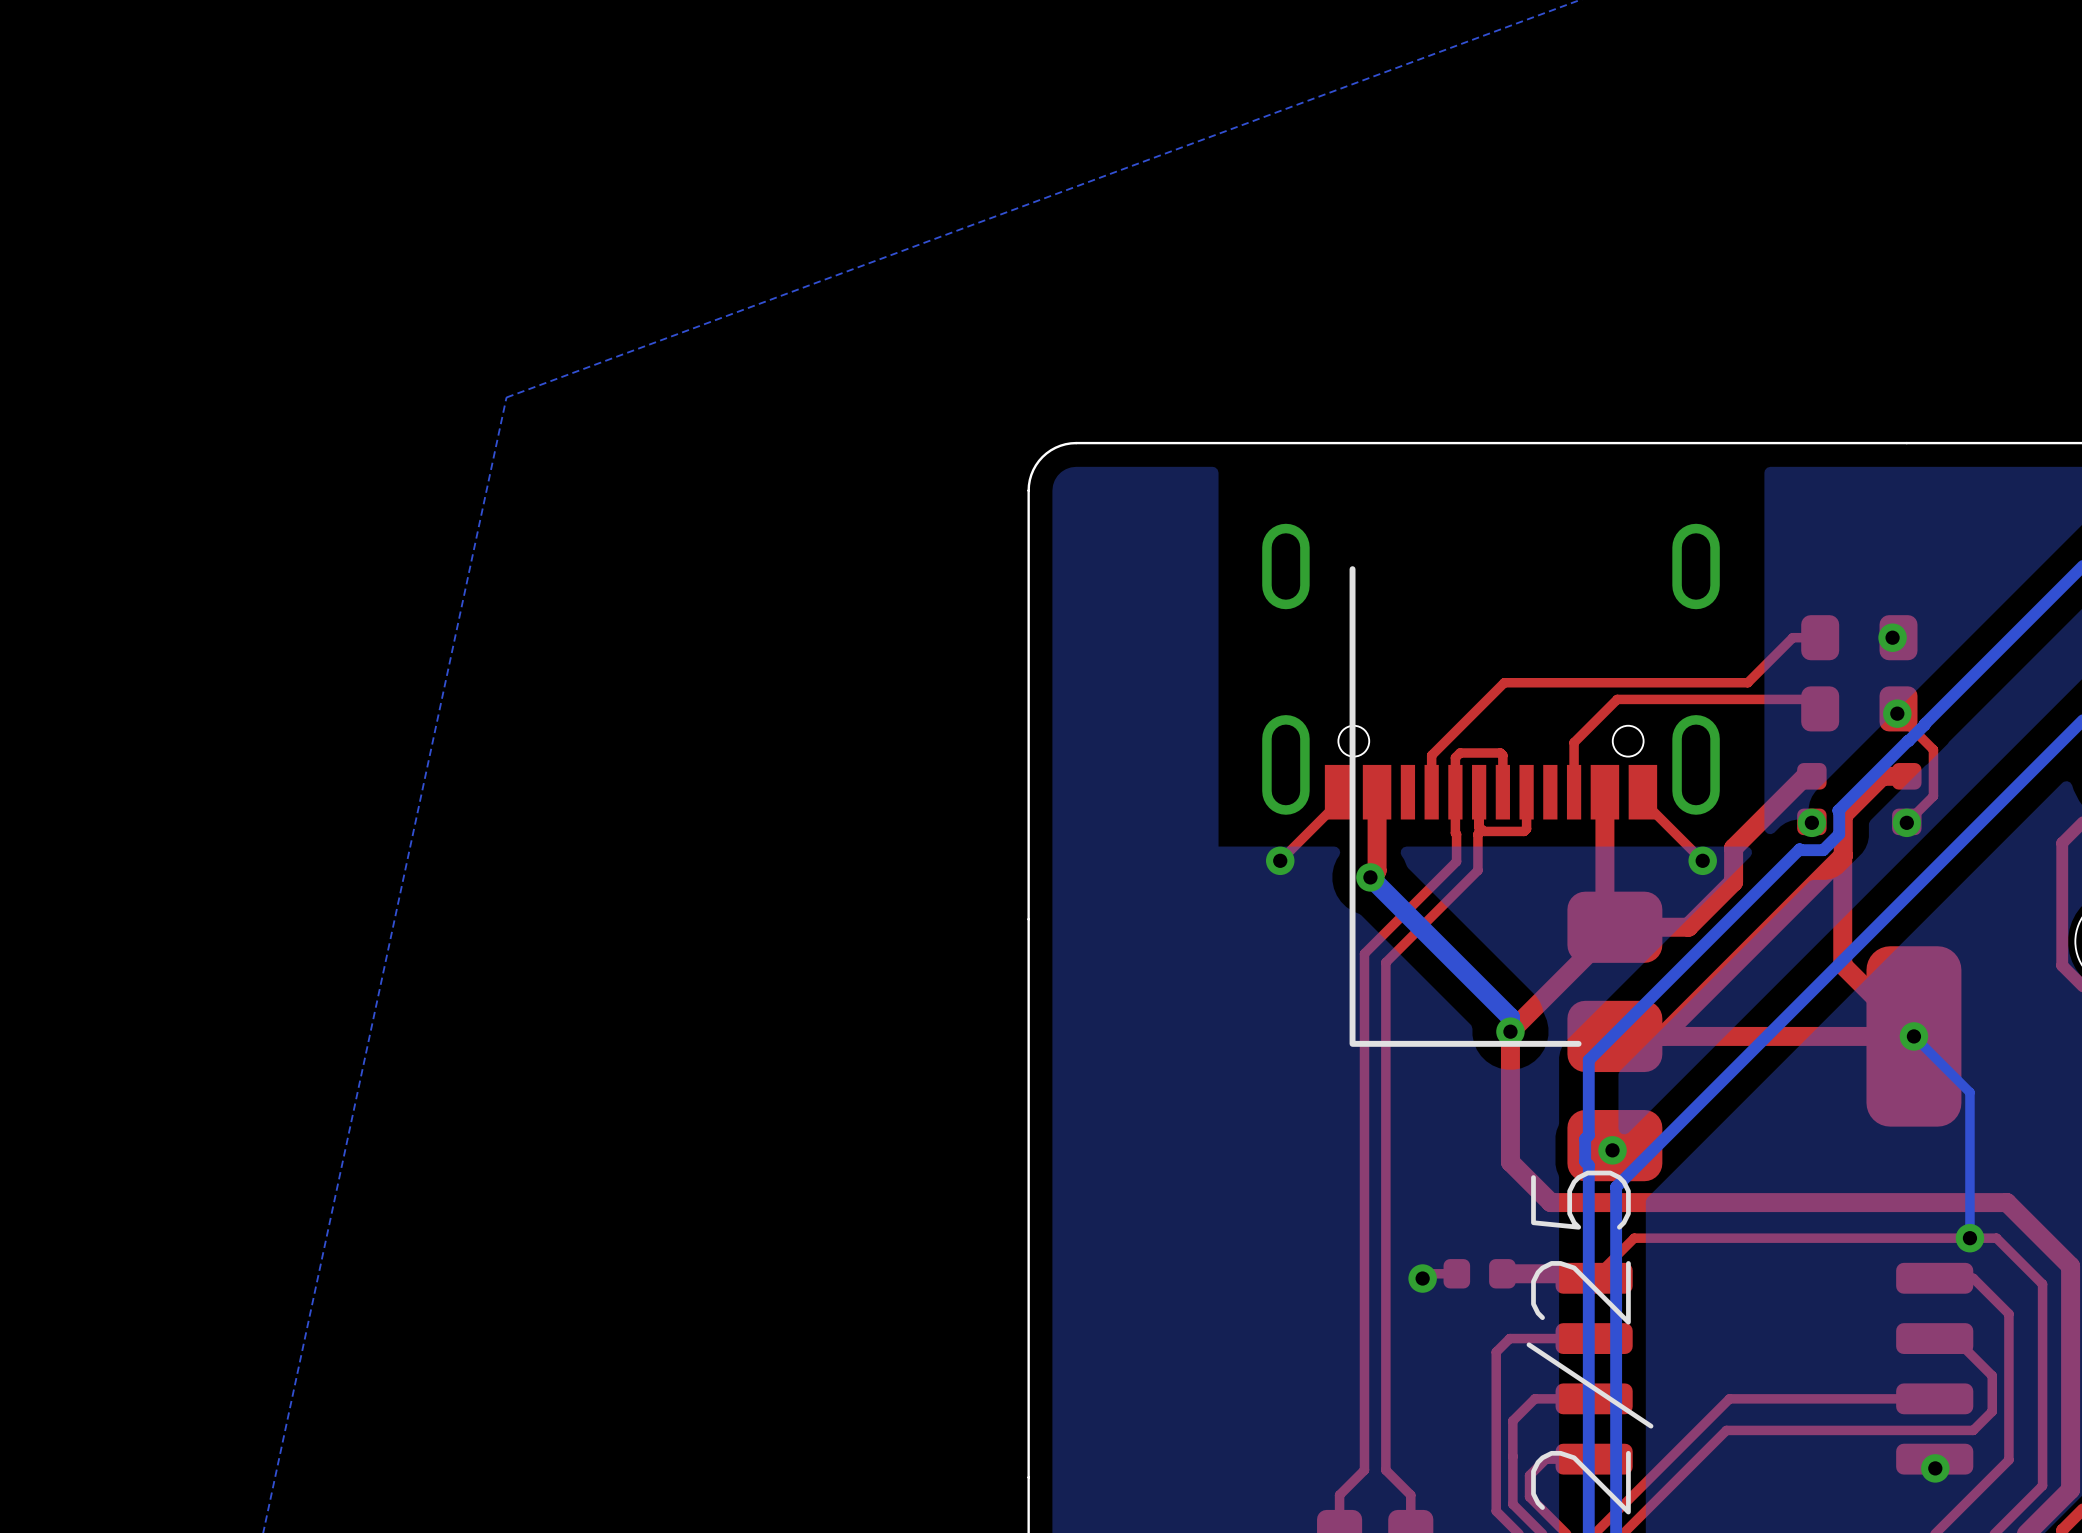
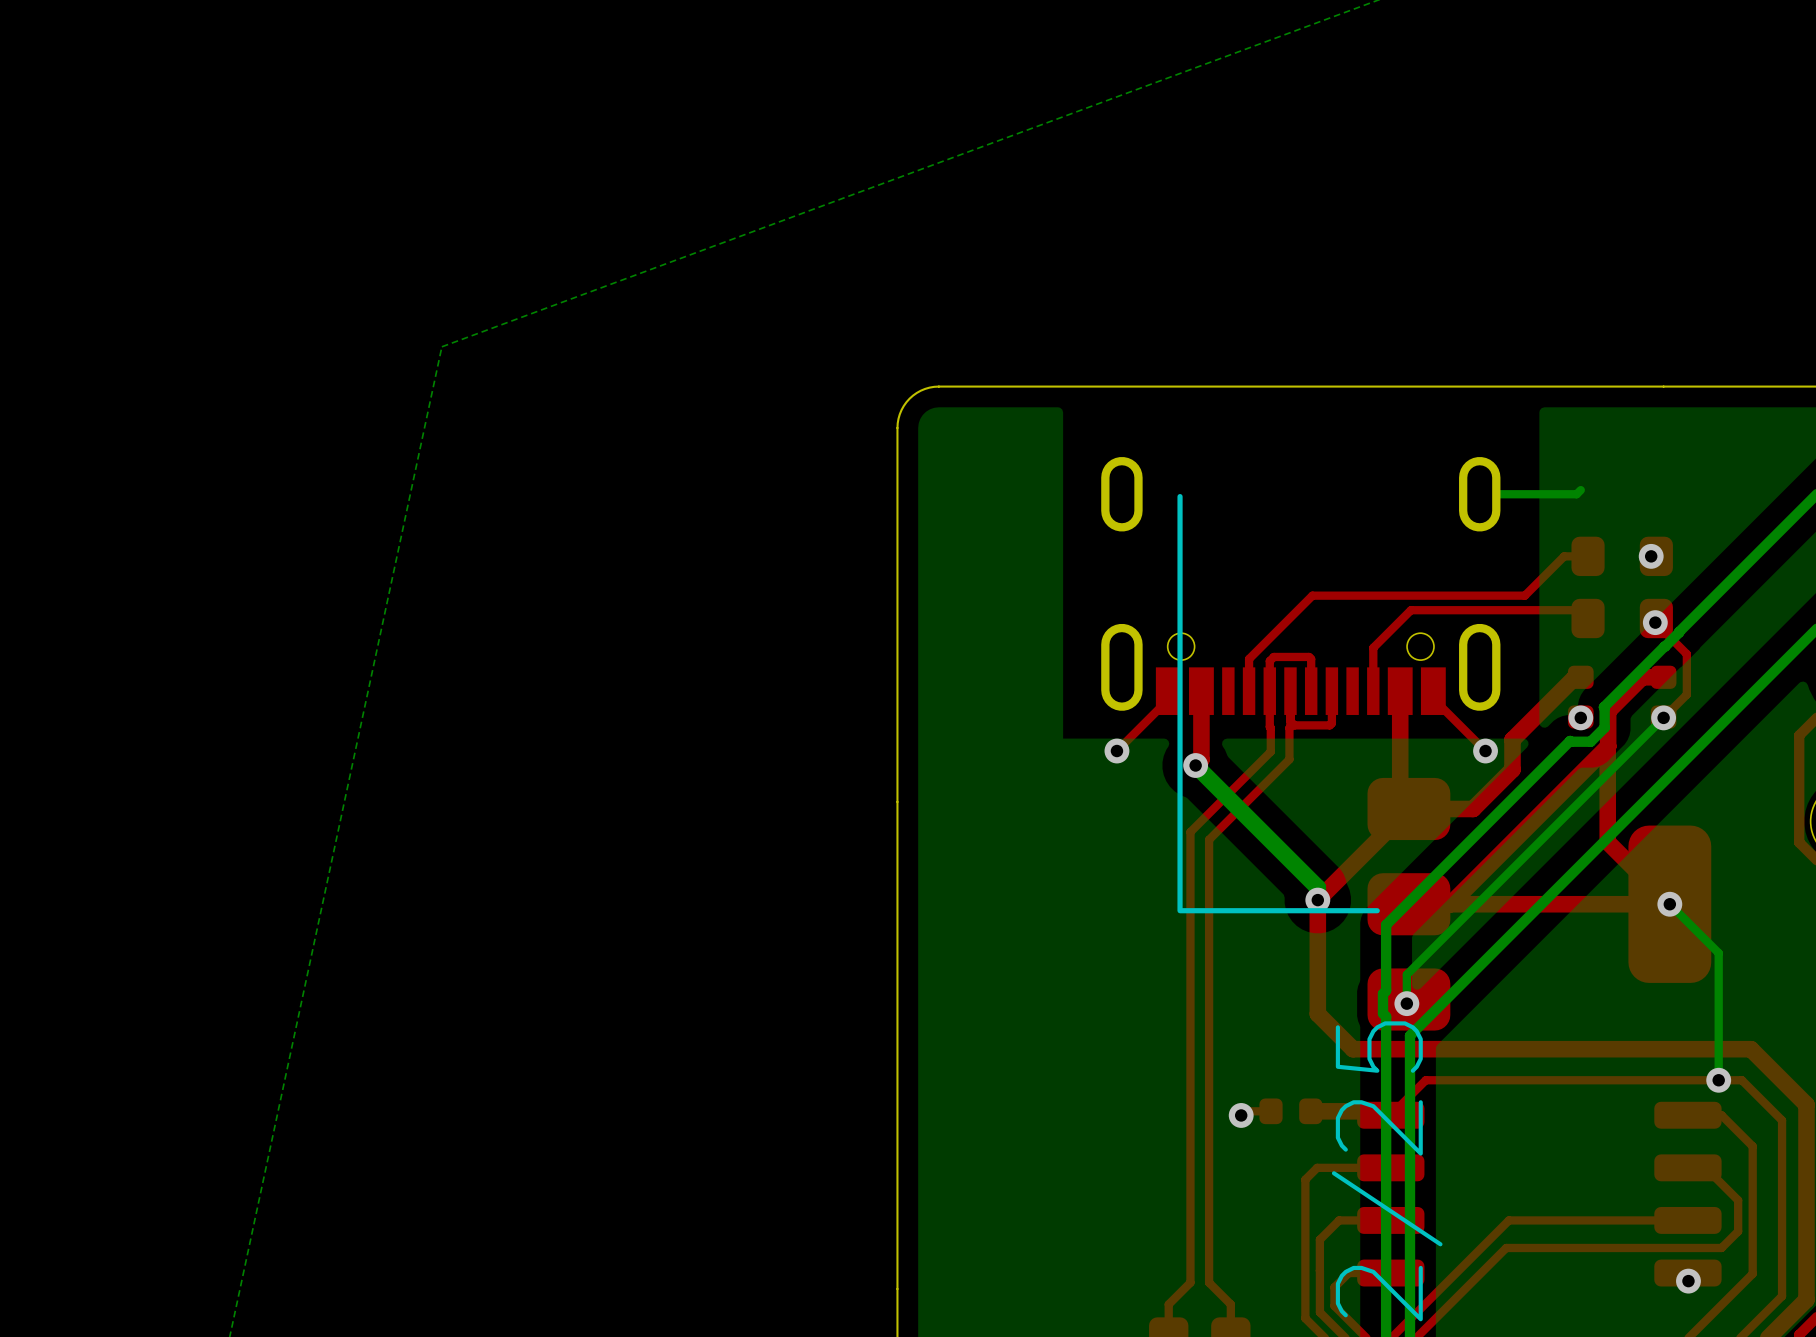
bottom track: none -> (1580, 490) (1576, 494) (1479, 494)
bottom track: none -> (1663, 717) (1406, 974) (1406, 1003)

